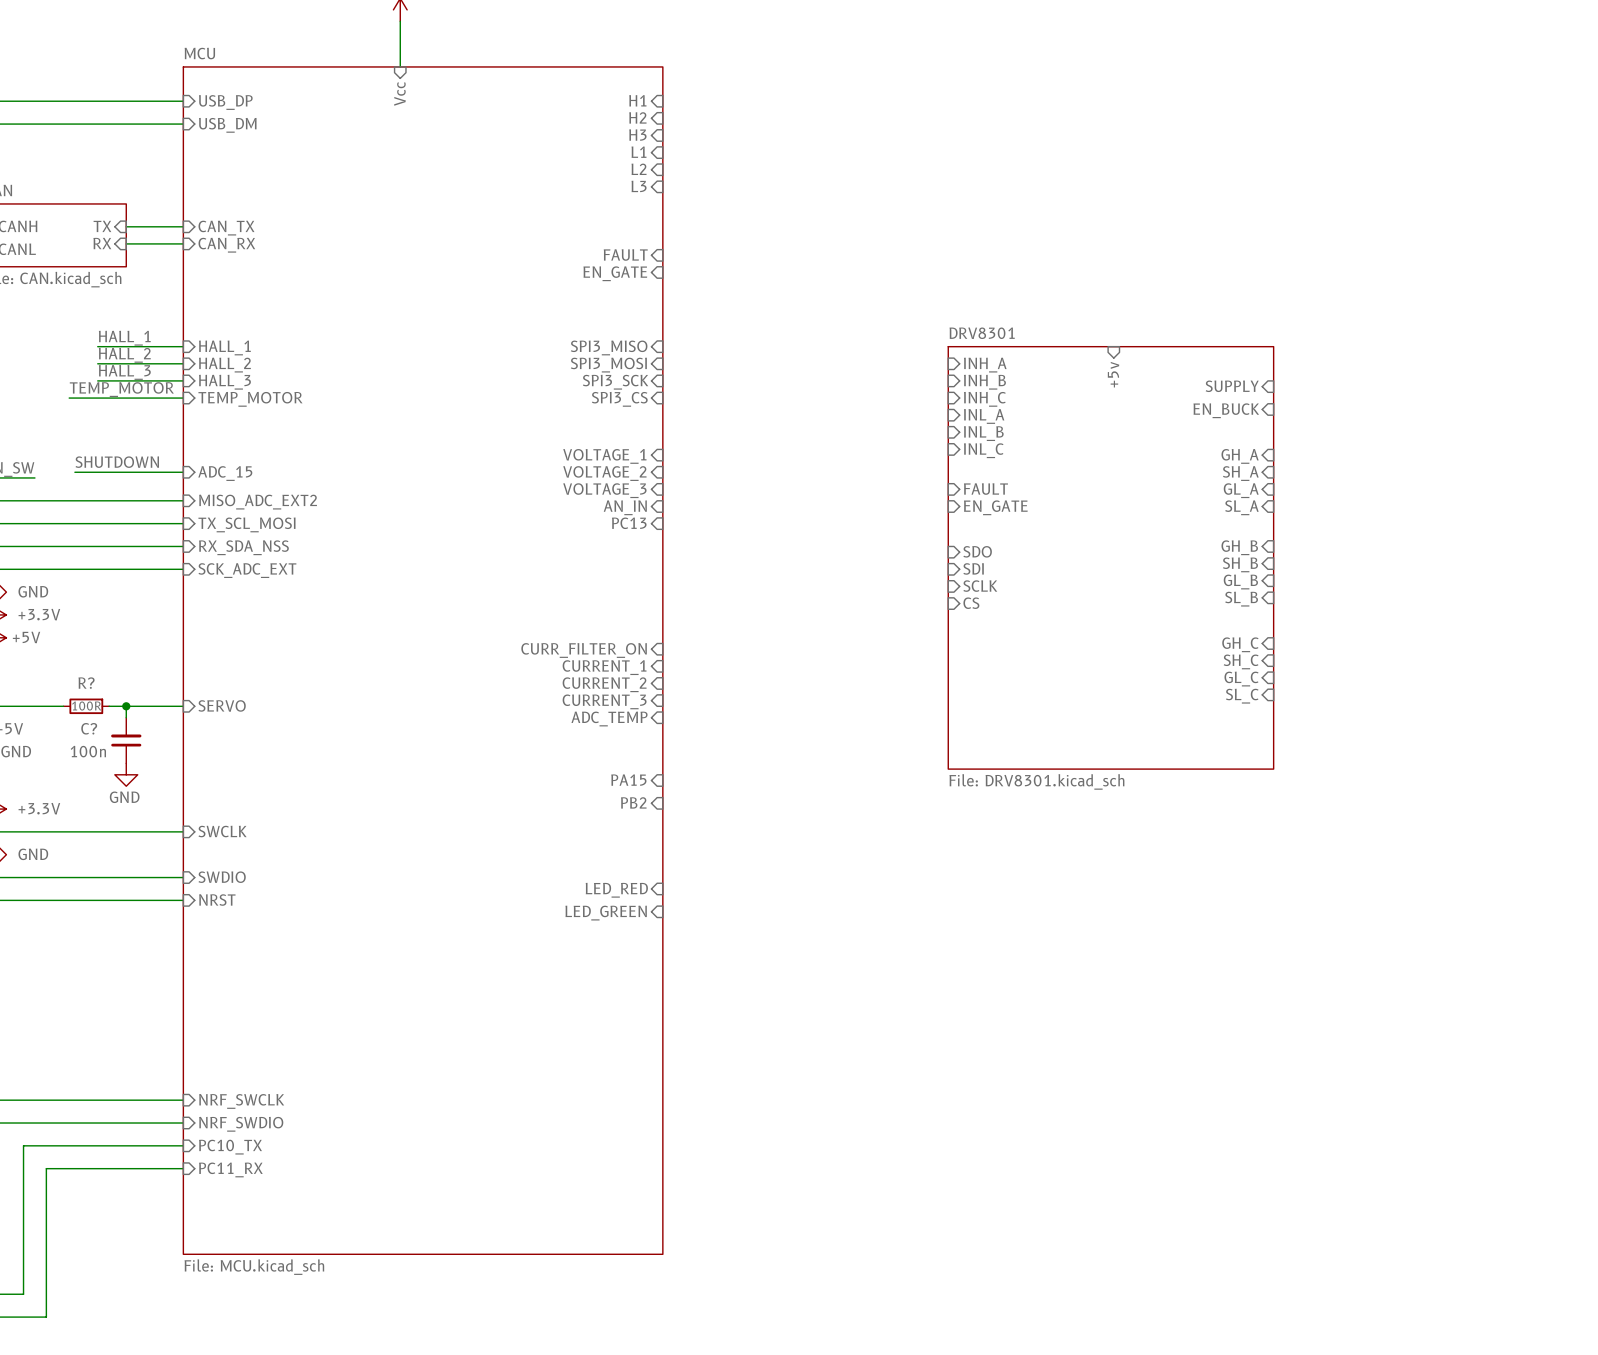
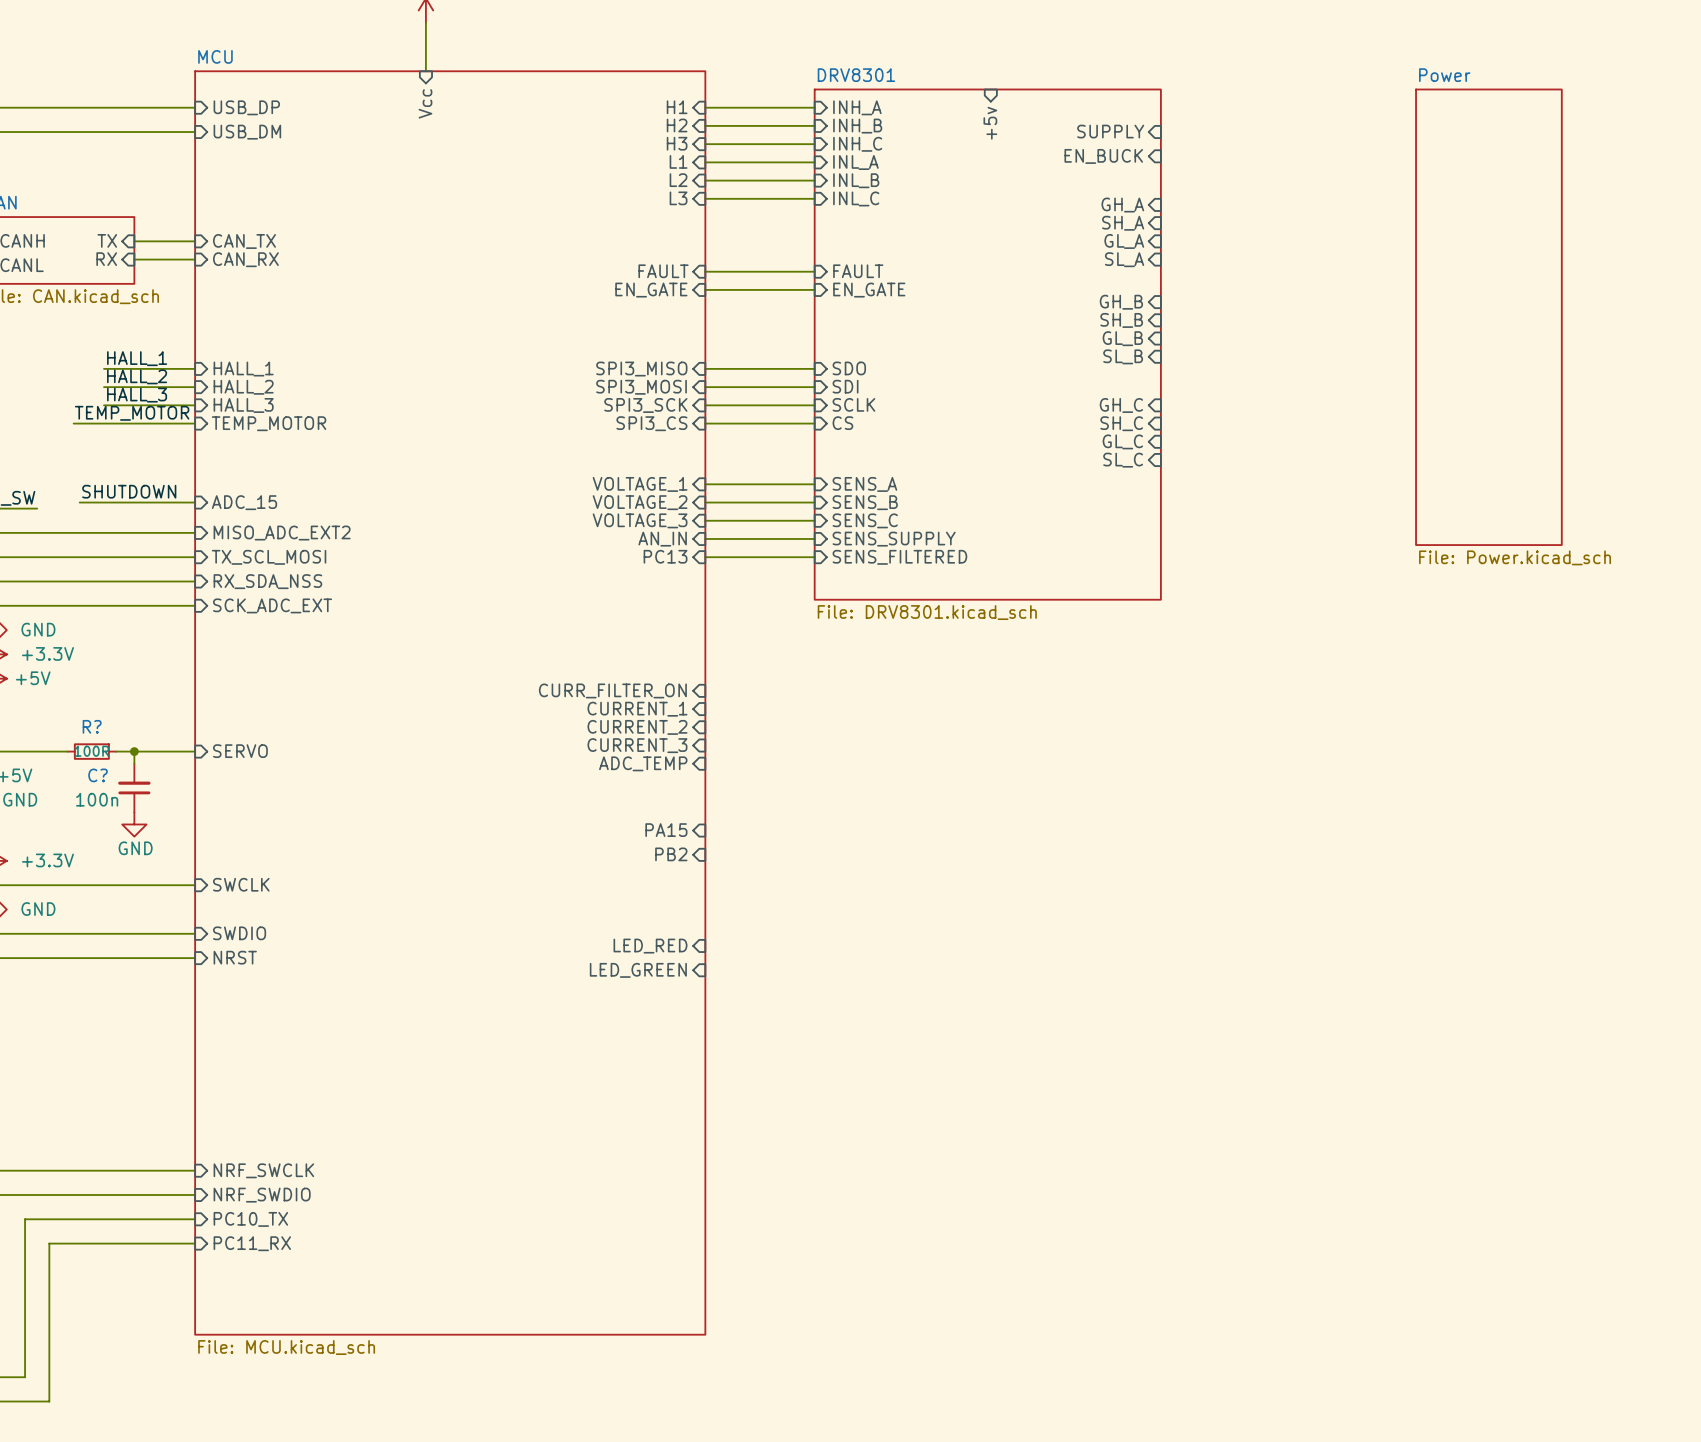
wire: none -> (705, 107) (814, 107)
sheet pin: none -> INH_A (857, 107)
sheet pin: none -> +5v (990, 123)
wire: none -> (705, 125) (814, 125)
sheet pin: none -> INH_B (857, 126)
sheet pin: none -> SUPPLY (1110, 131)
wire: none -> (705, 144) (814, 144)
sheet pin: none -> INH_C (857, 144)
sheet pin: none -> EN_BUCK (1103, 156)
wire: none -> (705, 162) (814, 162)
sheet pin: none -> INL_A (855, 162)
wire: none -> (705, 180) (814, 180)
sheet pin: none -> INL_B (856, 180)
wire: none -> (705, 198) (814, 198)
sheet pin: none -> INL_C (856, 198)
sheet pin: none -> GH_A (1122, 205)
sheet pin: none -> SH_A (1123, 223)
sheet pin: none -> GL_A (1124, 241)
sheet pin: none -> SL_A (1124, 259)
sheet pin: none -> FAULT (858, 271)
wire: none -> (705, 271) (814, 271)
wire: none -> (705, 289) (814, 289)
sheet pin: none -> EN_GATE (869, 290)
sheet pin: none -> GH_B (1121, 302)
sheet Power: none -> File: Power.kicad_sch (1488, 317)
sheet pin: none -> SH_B (1121, 320)
sheet pin: none -> GL_B (1122, 338)
sheet DRV8301 name position: DRV8301 (982, 333) -> DRV8301 (856, 75)
sheet pin: none -> SL_B (1123, 356)
sheet DRV8301 shape: [947, 345, 1275, 770] -> [813, 88, 1162, 601]
wire: none -> (705, 368) (814, 368)
sheet pin: none -> SDO (849, 368)
wire: none -> (705, 387) (814, 387)
sheet pin: none -> SDI (845, 386)
sheet pin: INH_A (985, 365) -> none
sheet pin: +5v (1113, 374) -> none
wire: none -> (705, 405) (814, 405)
sheet pin: none -> SCLK (853, 404)
sheet pin: INH_B (984, 382) -> none
sheet pin: none -> GH_C (1121, 405)
sheet pin: SUPPLY (1232, 386) -> none
sheet pin: none -> CS (842, 423)
wire: none -> (705, 423) (814, 423)
sheet pin: INH_C (984, 399) -> none
sheet pin: none -> SH_C (1121, 423)
sheet pin: EN_BUCK (1226, 410) -> none
sheet pin: INL_A (984, 416) -> none
sheet pin: none -> GL_C (1122, 441)
sheet pin: INL_B (983, 433) -> none
sheet pin: none -> SL_C (1123, 460)
sheet pin: INL_C (983, 450) -> none
wire: none -> (705, 484) (814, 484)
sheet pin: none -> SENS_A (864, 484)
sheet pin: GH_A (1240, 456) -> none
wire: none -> (705, 502) (814, 502)
sheet pin: none -> SENS_B (865, 502)
sheet pin: SH_A (1240, 473) -> none
wire: none -> (705, 520) (814, 520)
sheet pin: FAULT (985, 489) -> none
sheet pin: none -> SENS_C (865, 520)
sheet pin: GL_A (1241, 490) -> none
wire: none -> (705, 538) (814, 538)
sheet pin: none -> SENS_SUPPLY (894, 539)
sheet pin: EN_GATE (995, 507) -> none
sheet pin: SL_A (1241, 507) -> none
wire: none -> (705, 557) (814, 557)
sheet pin: none -> SENS_FILTERED (899, 557)
sheet pin: GH_B (1239, 547) -> none
sheet pin: SDO (977, 551) -> none
sheet pin: SH_B (1240, 564) -> none
sheet pin: SDI (973, 568) -> none
sheet pin: GL_B (1240, 582) -> none
sheet pin: SCLK (980, 586) -> none
sheet pin: SL_B (1241, 599) -> none
sheet pin: CS (971, 603) -> none
sheet pin: GH_C (1240, 644) -> none
sheet pin: SH_C (1241, 661) -> none
sheet pin: GL_C (1241, 679) -> none
sheet pin: SL_C (1242, 696) -> none
sheet DRV8301 value position: File: DRV8301.kicad_sch (1036, 781) -> File: DRV8301.kicad_sch (927, 612)

